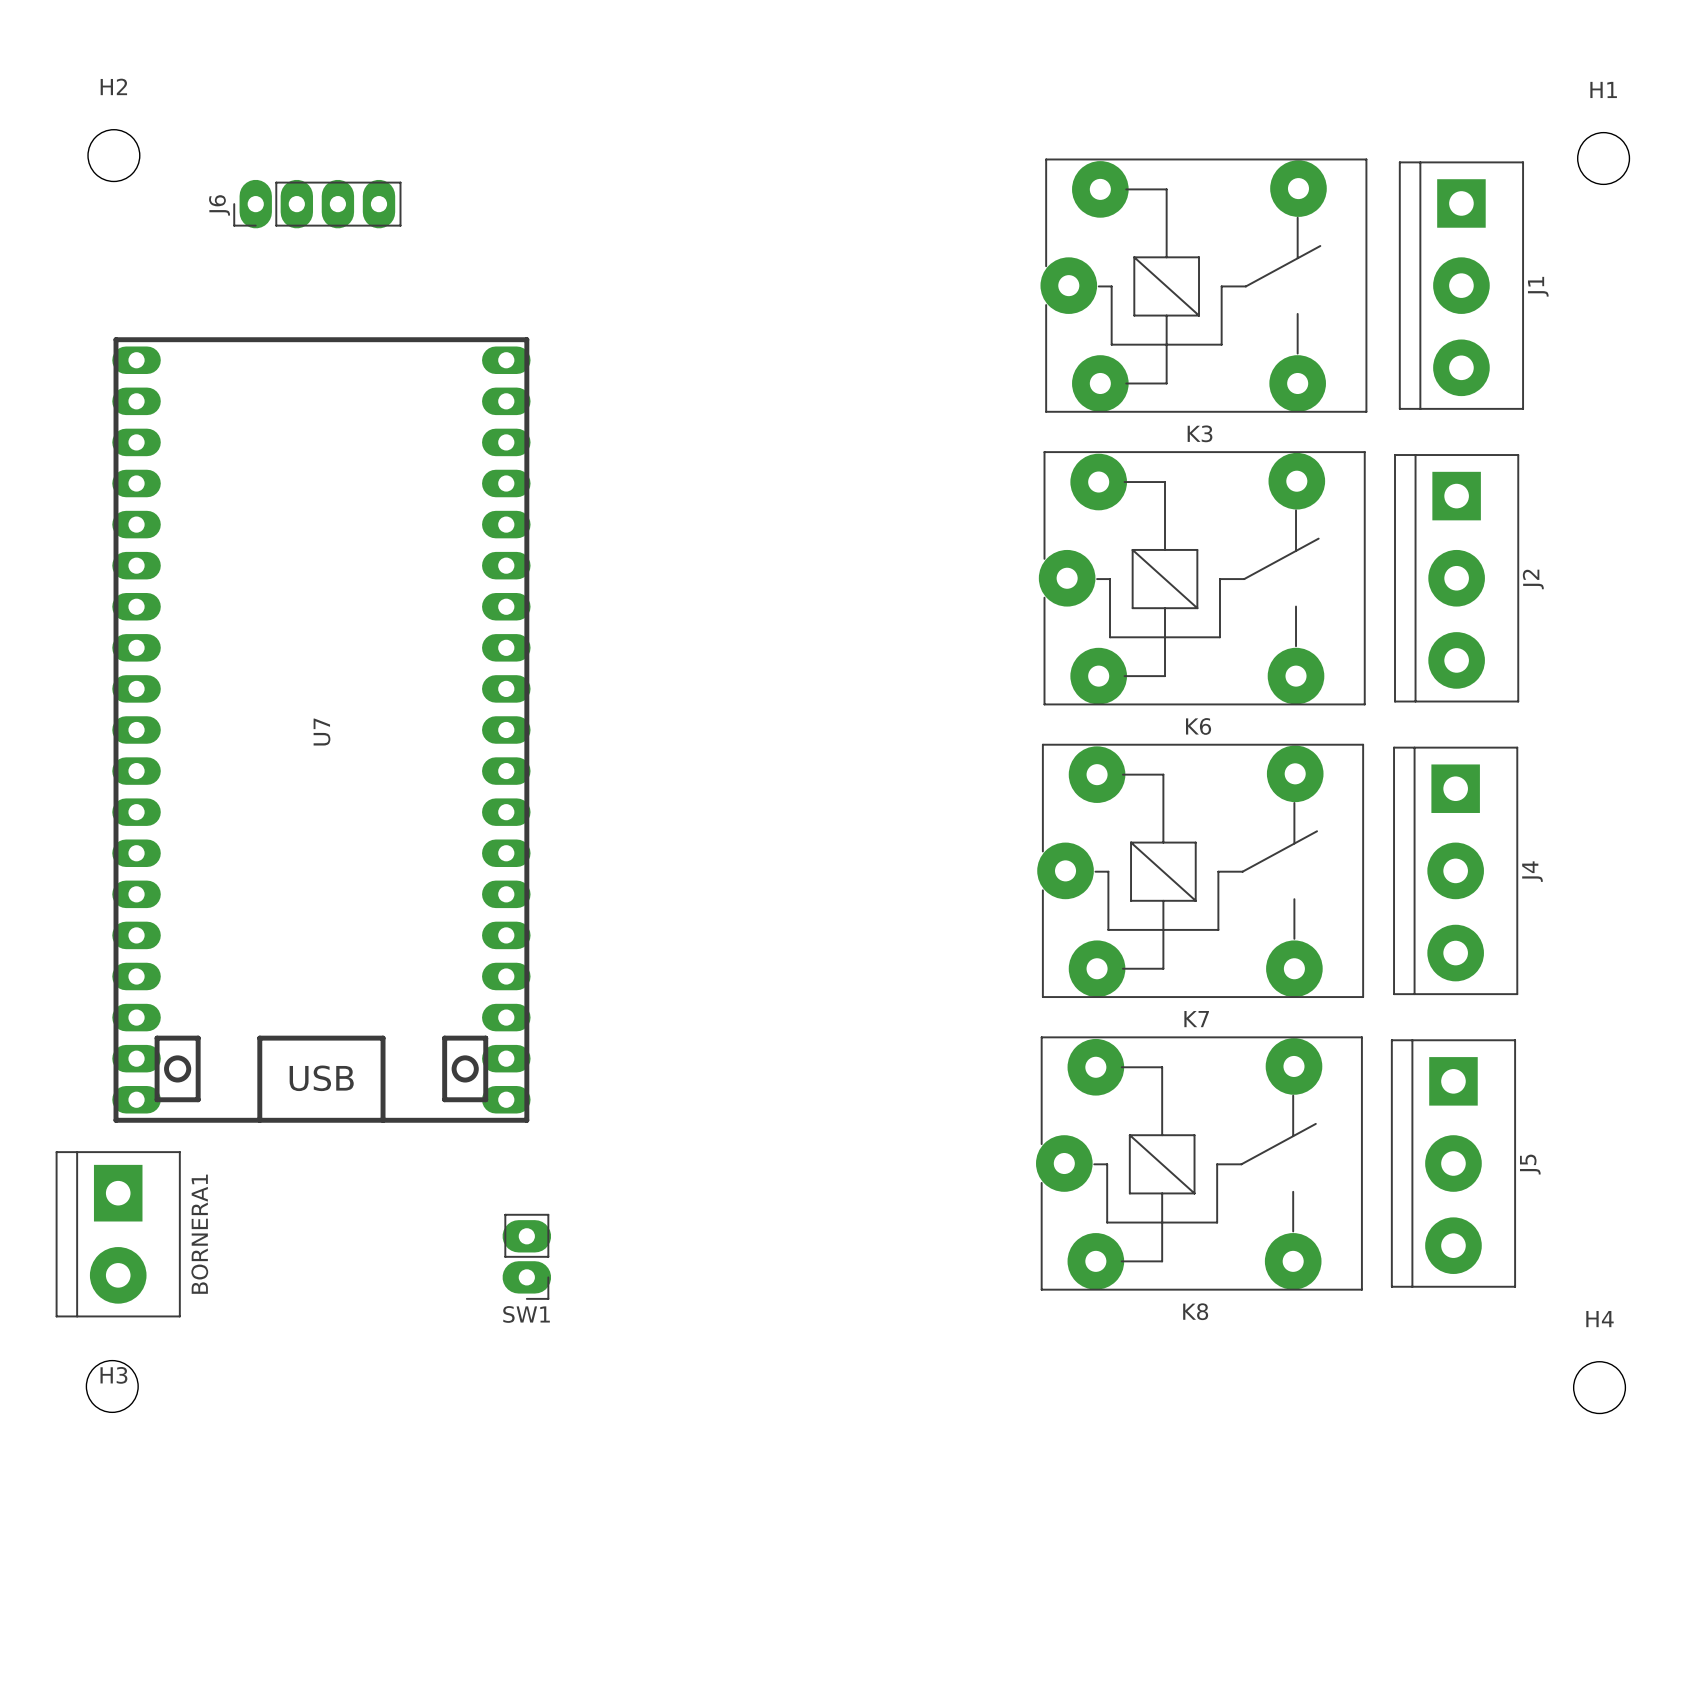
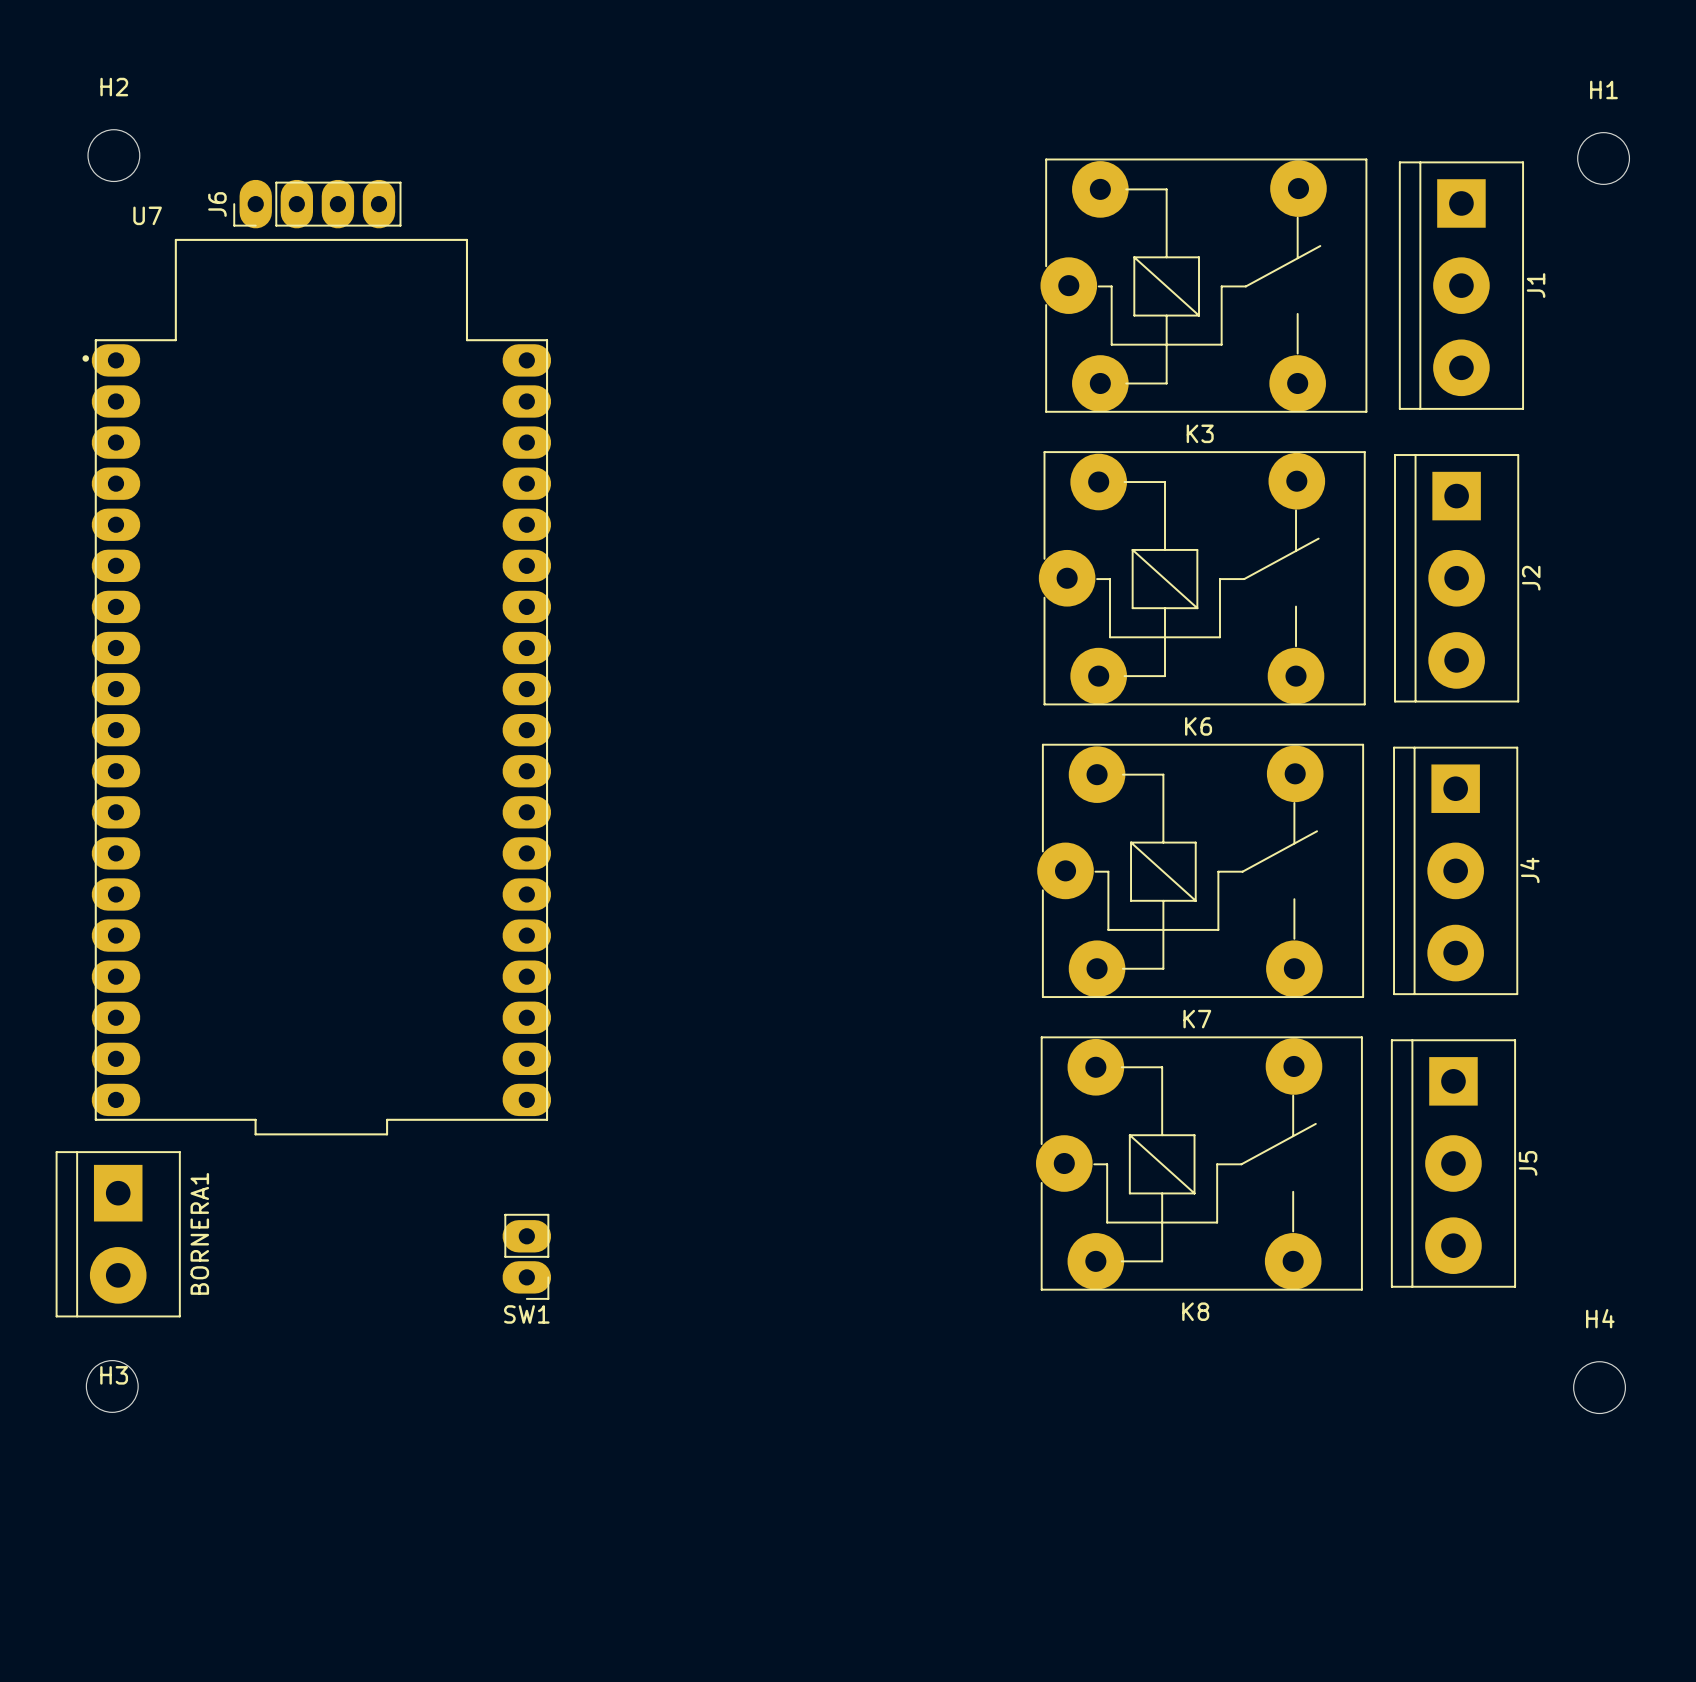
U7 footprint: [112, 337, 531, 1123] -> [82, 238, 552, 1136]
U7 name position: U7 (321, 732) -> U7 (147, 215)

